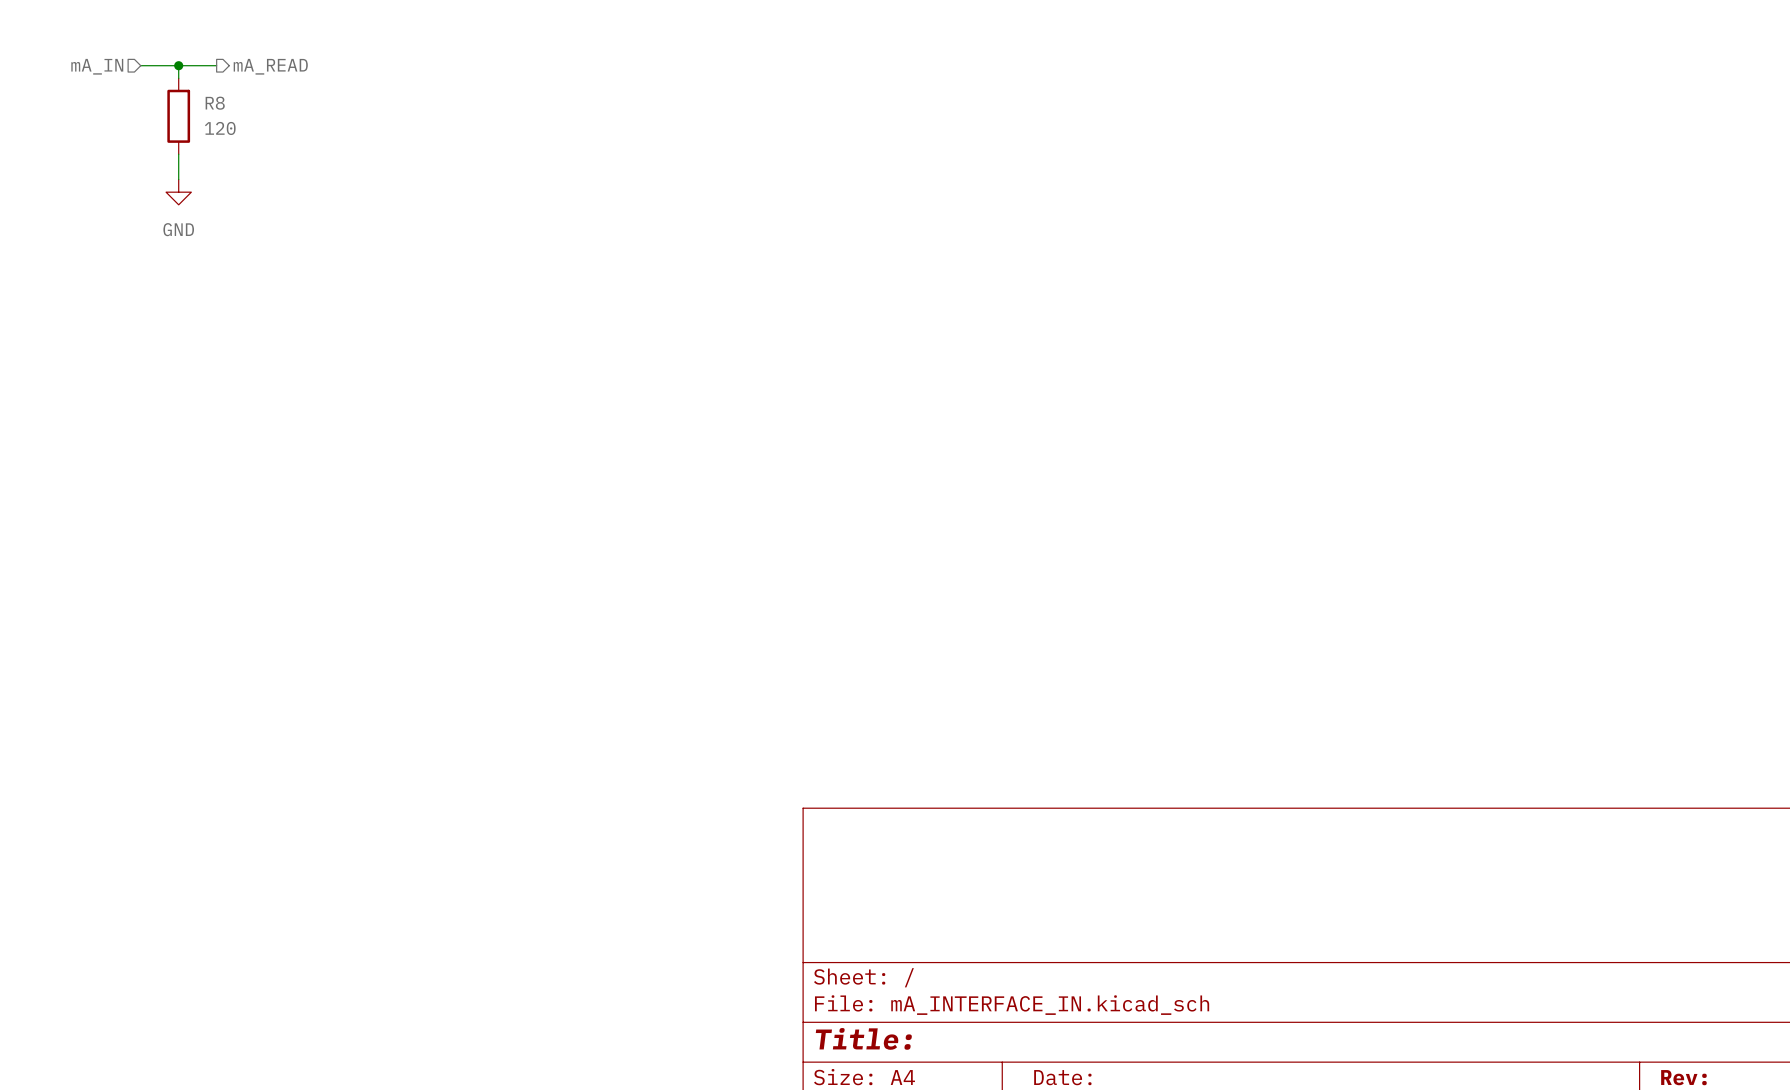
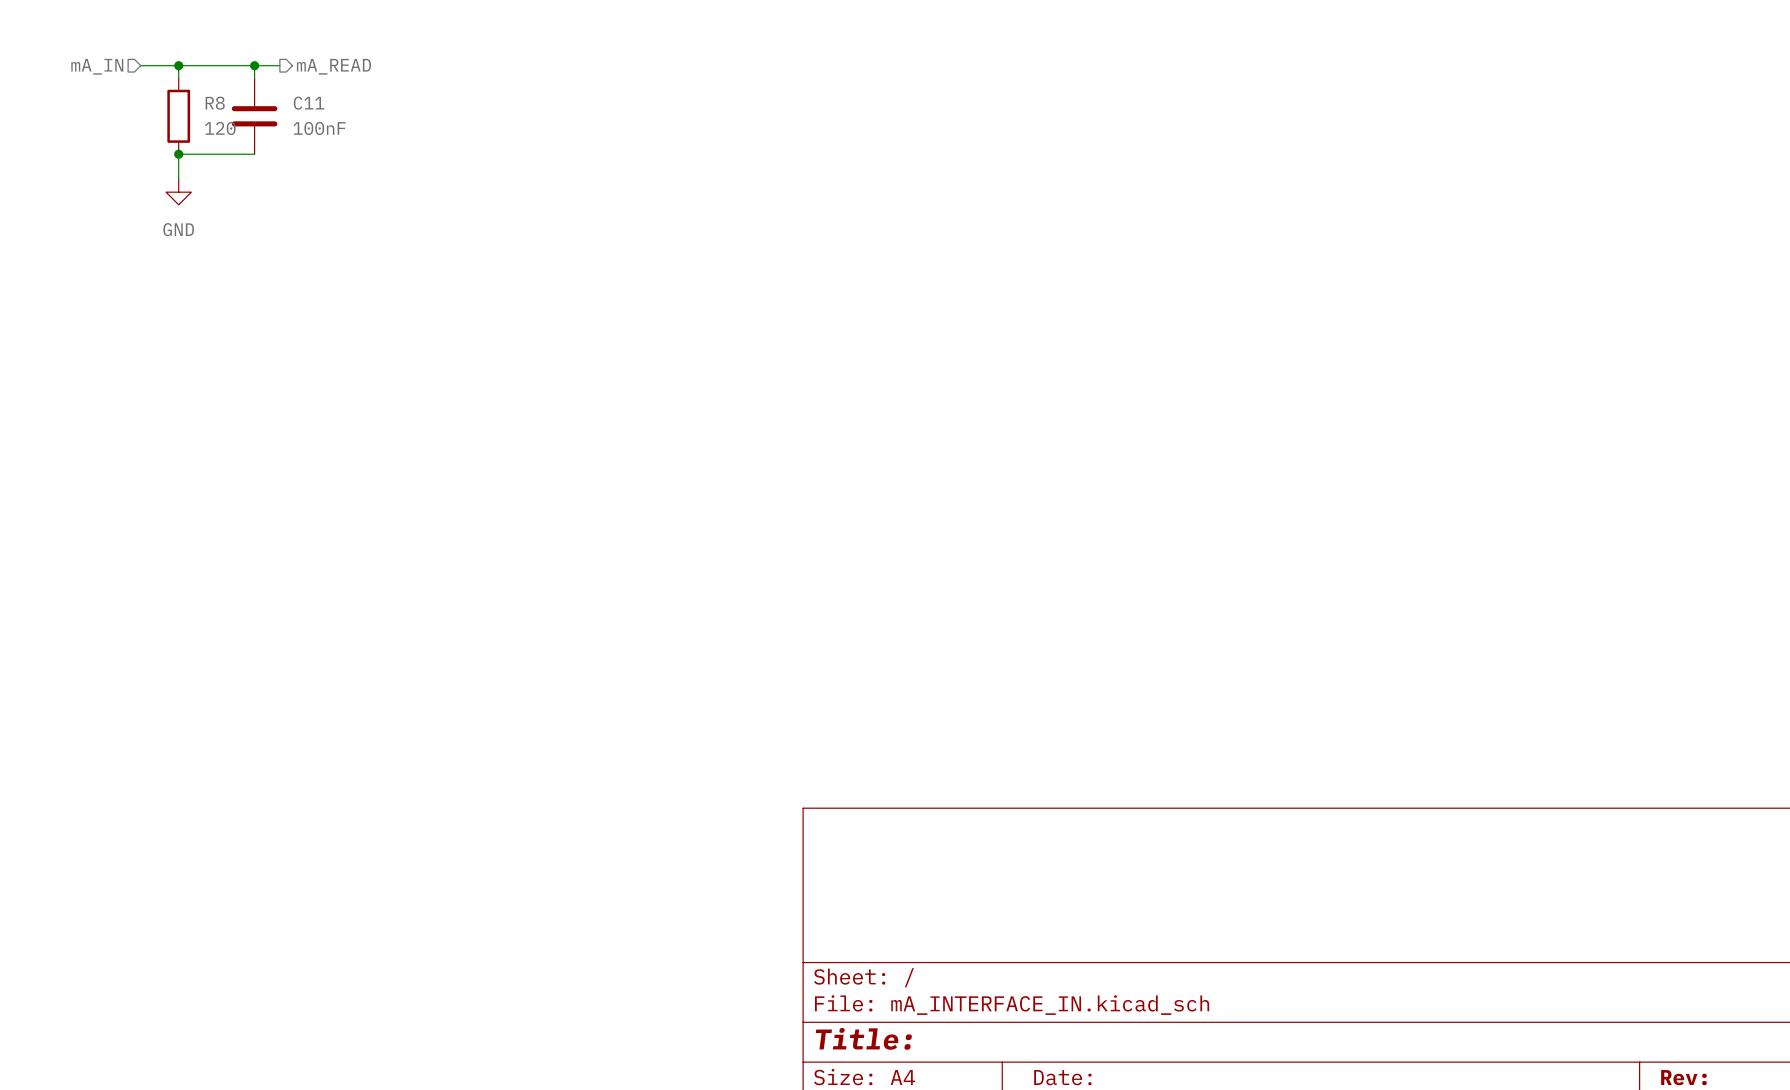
wire: none -> (216, 65) (279, 65)
wire: none -> (254, 65) (254, 78)
junction: none -> (254, 65)
hierarchical label position: mA_READ (270, 66) -> mA_READ (333, 66)
C11: none -> 100nF (254, 116)
wire: none -> (178, 154) (254, 154)
junction: none -> (178, 154)

